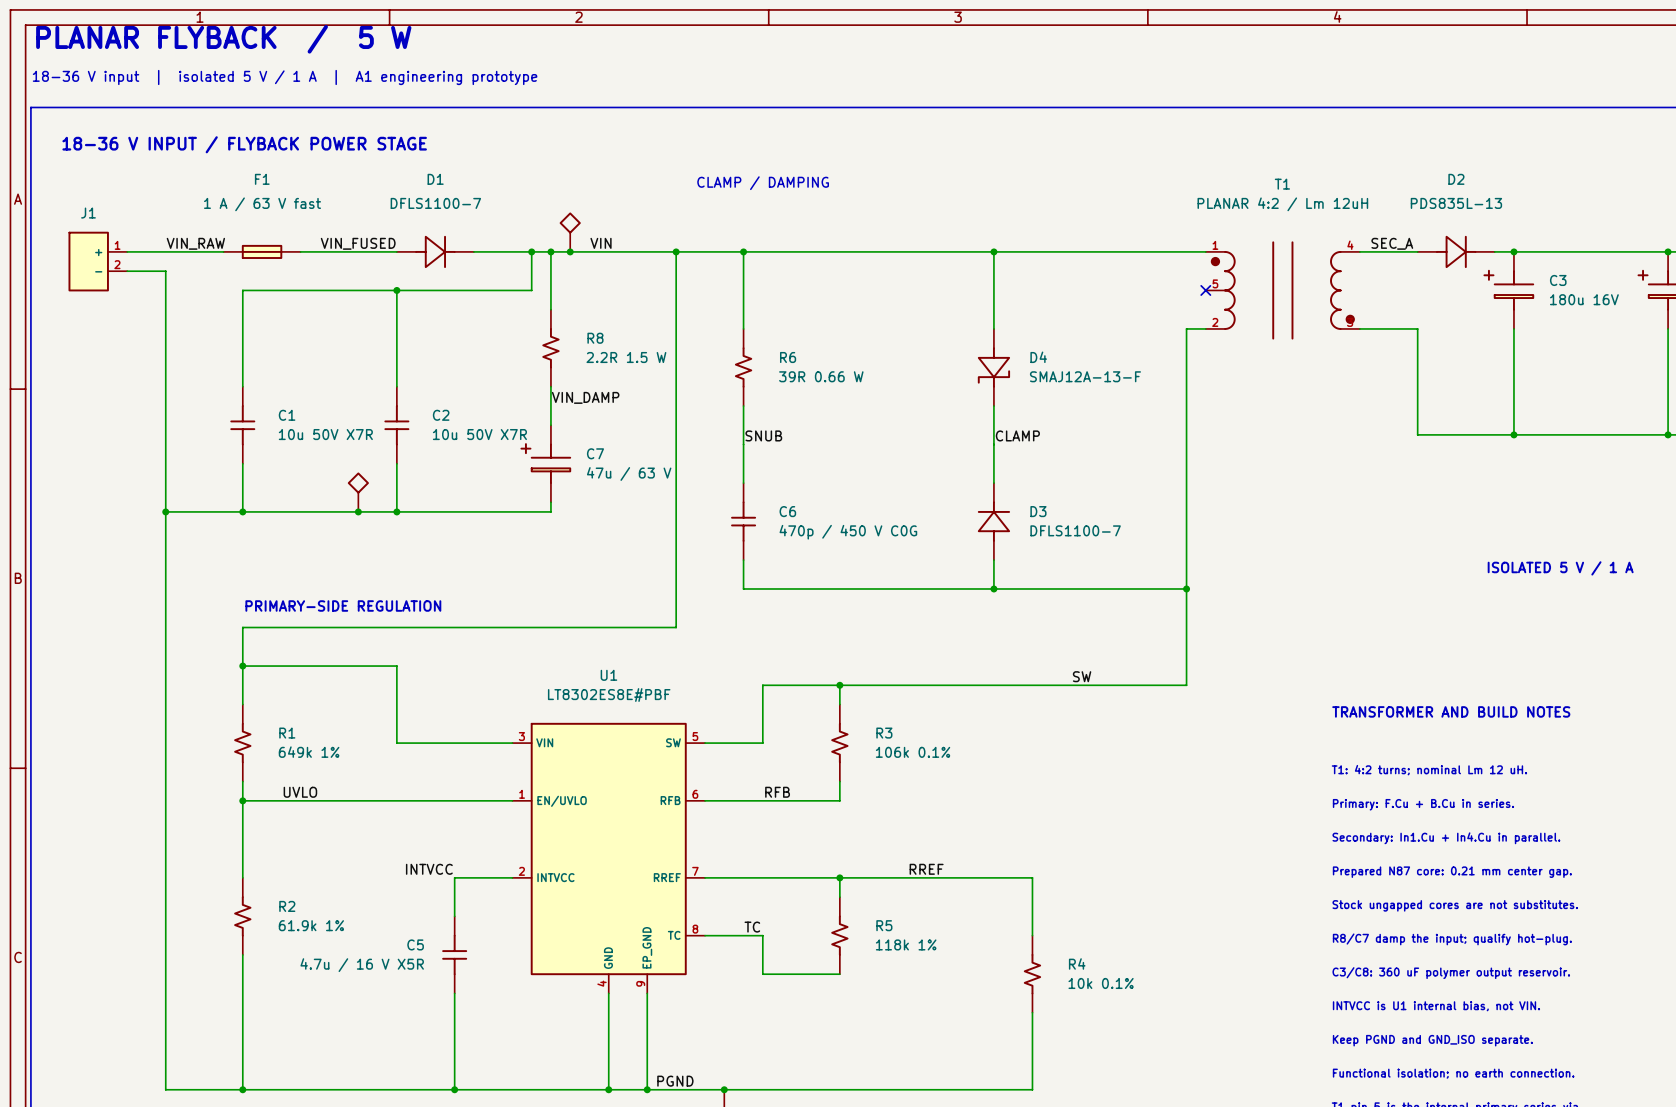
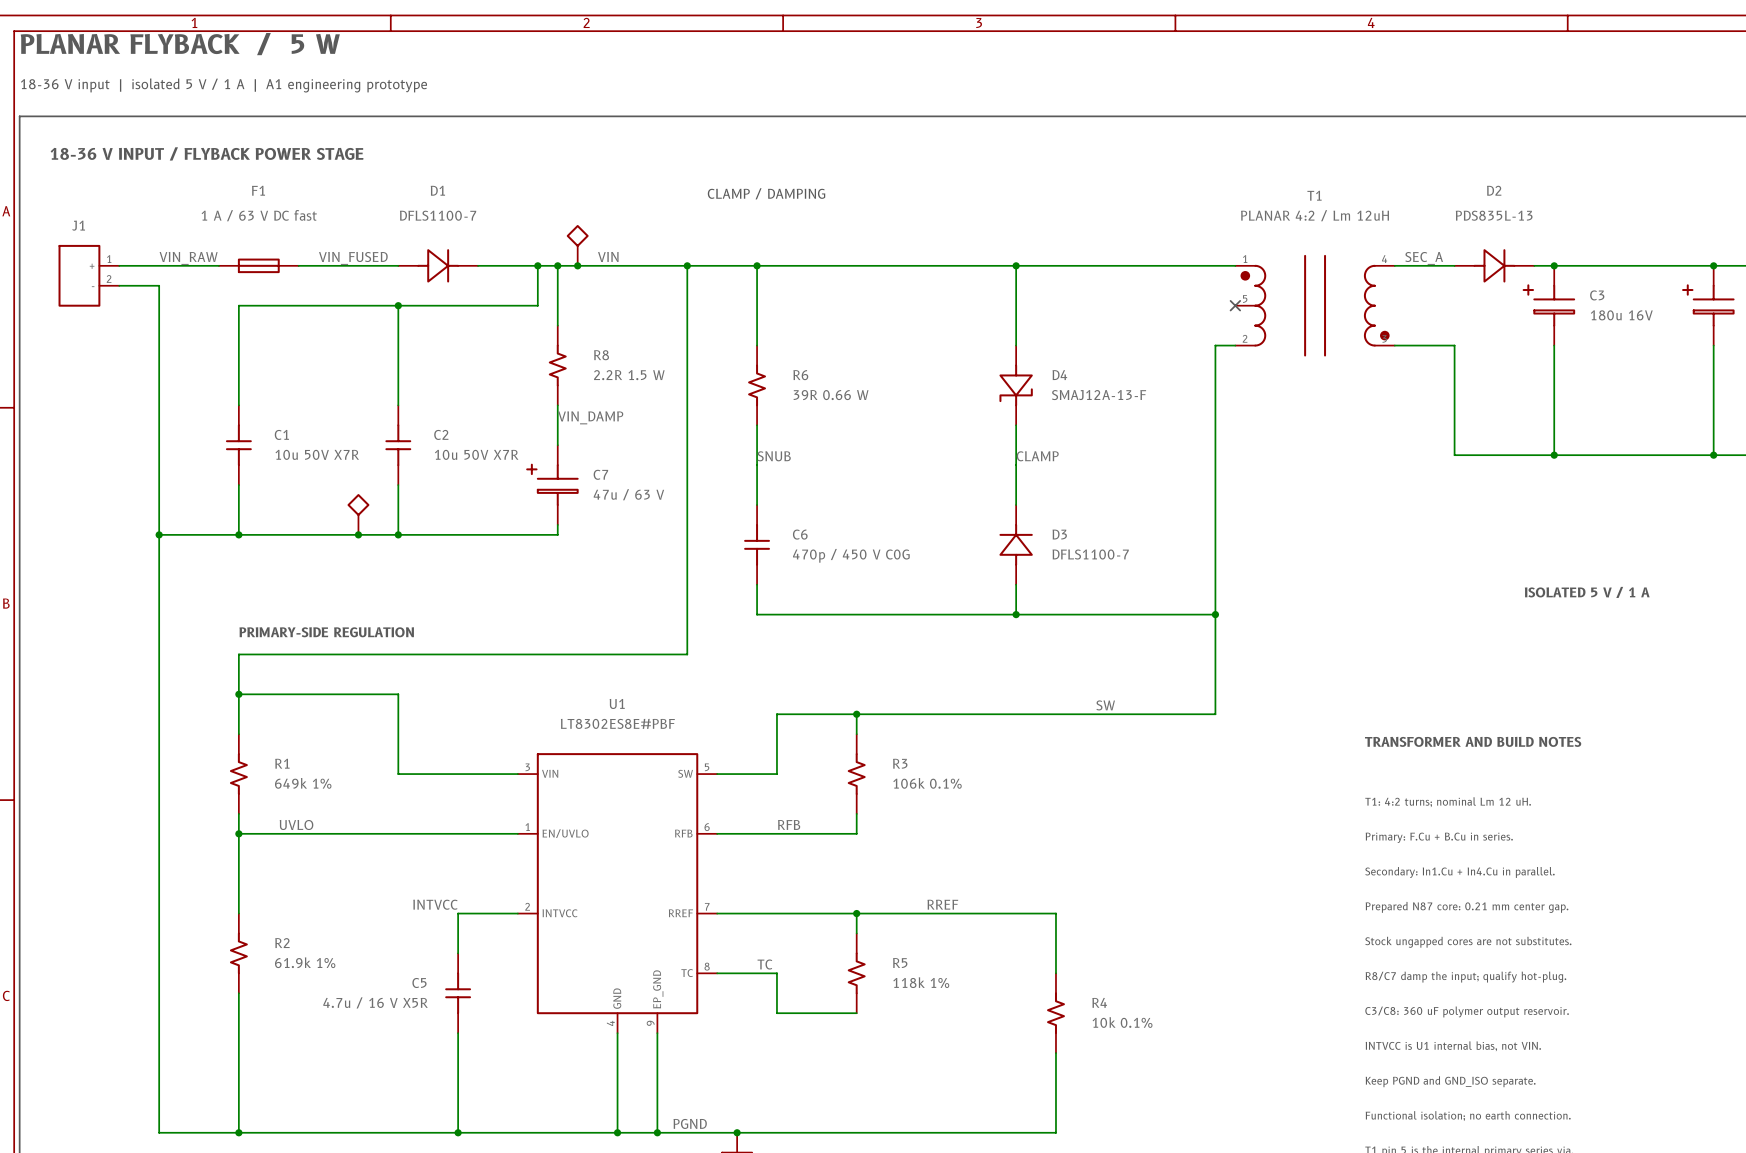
F1 value: 1 A / 63 V fast (262, 204) -> 1 A / 63 V DC fast (259, 215)

